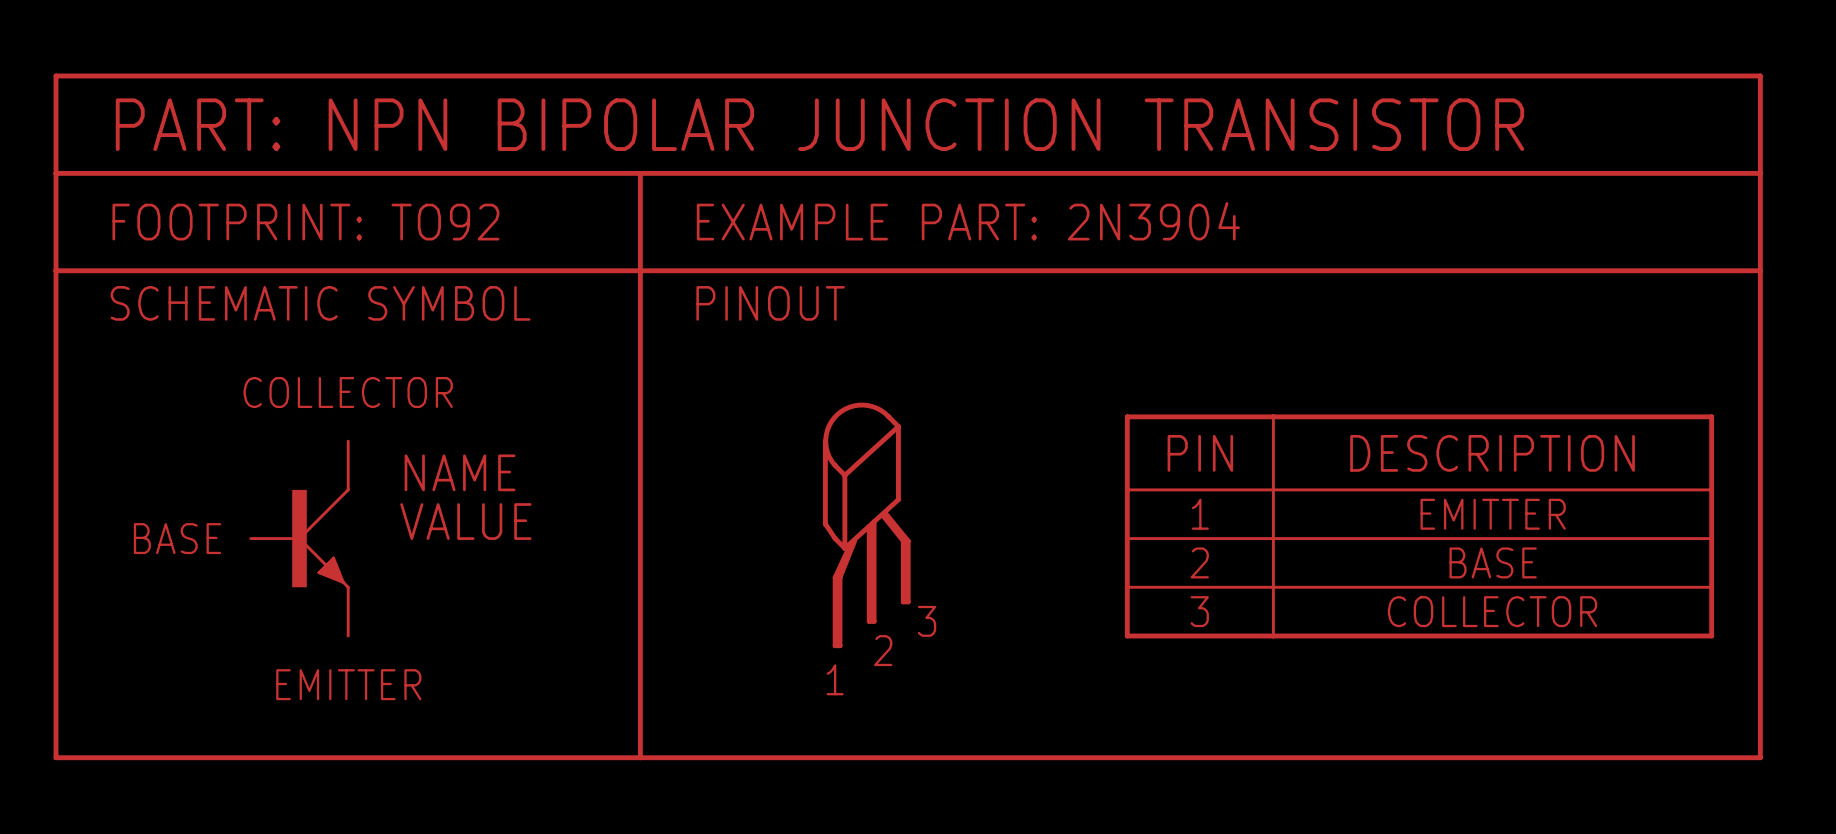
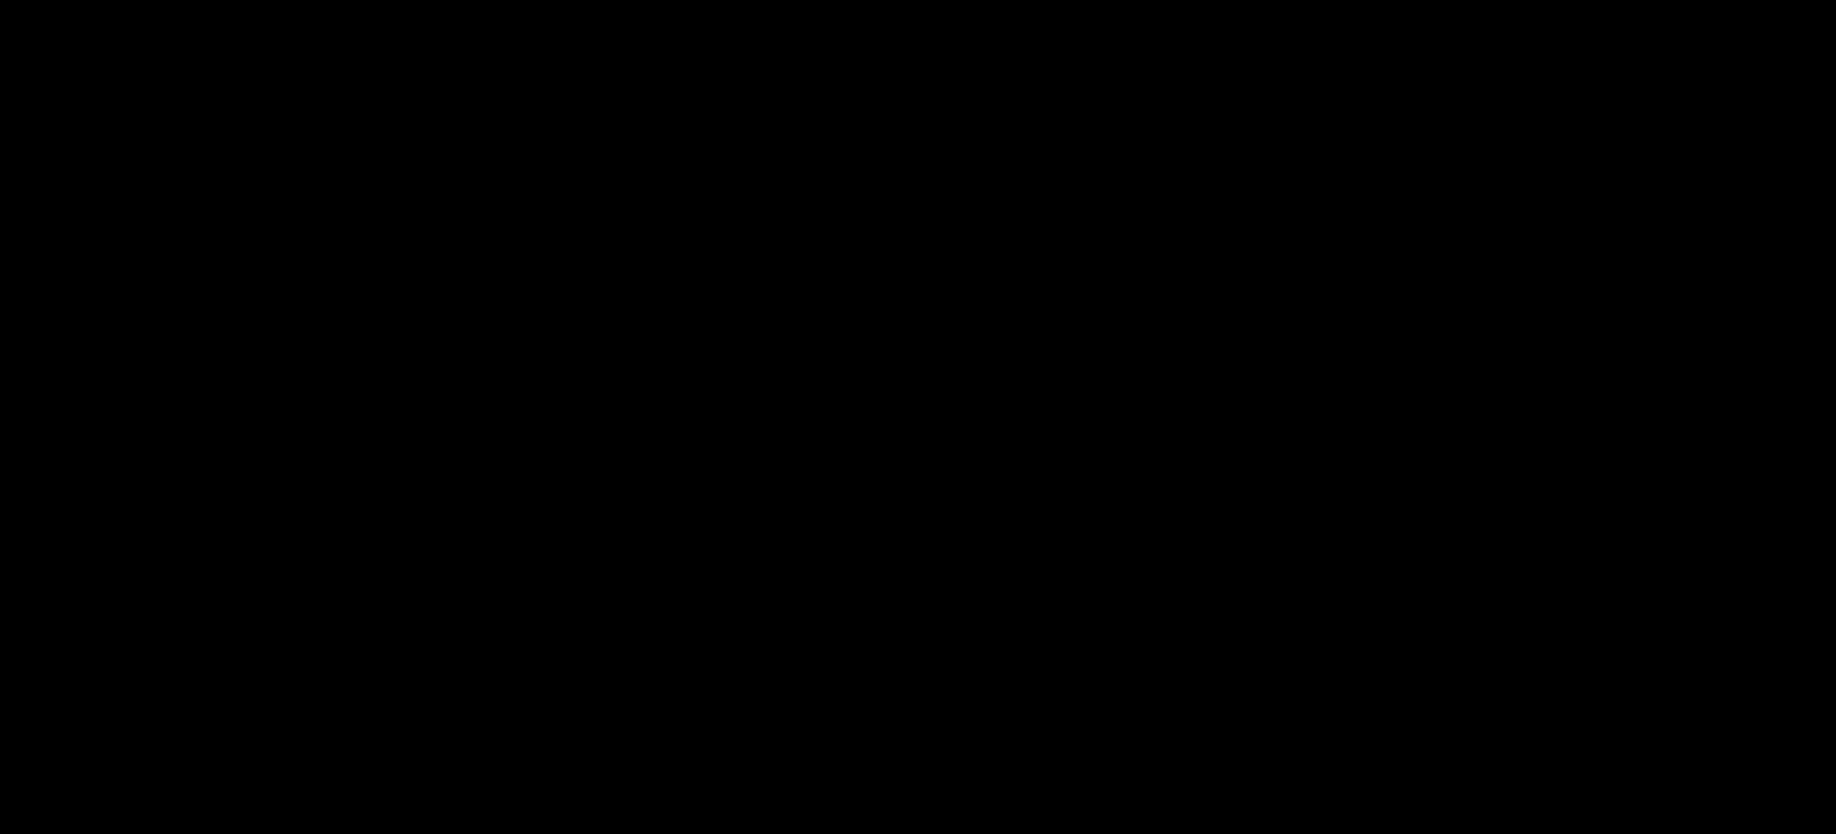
part: (908, 416) -> none

